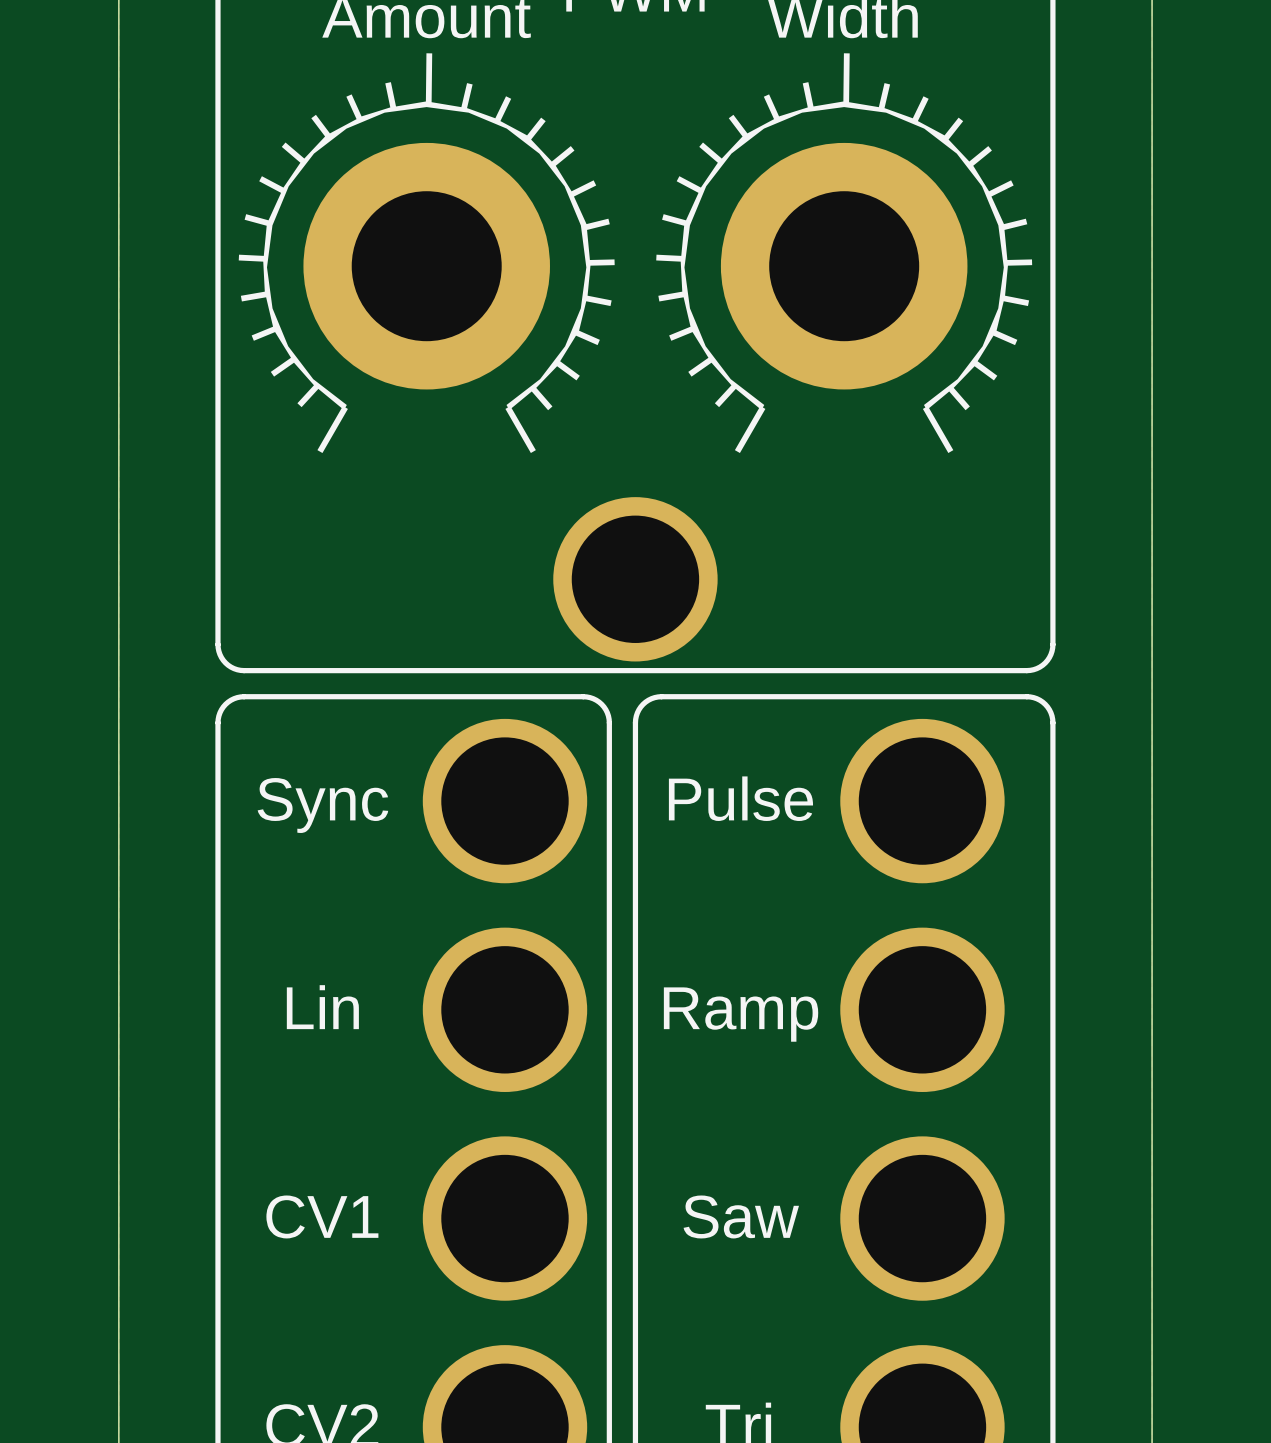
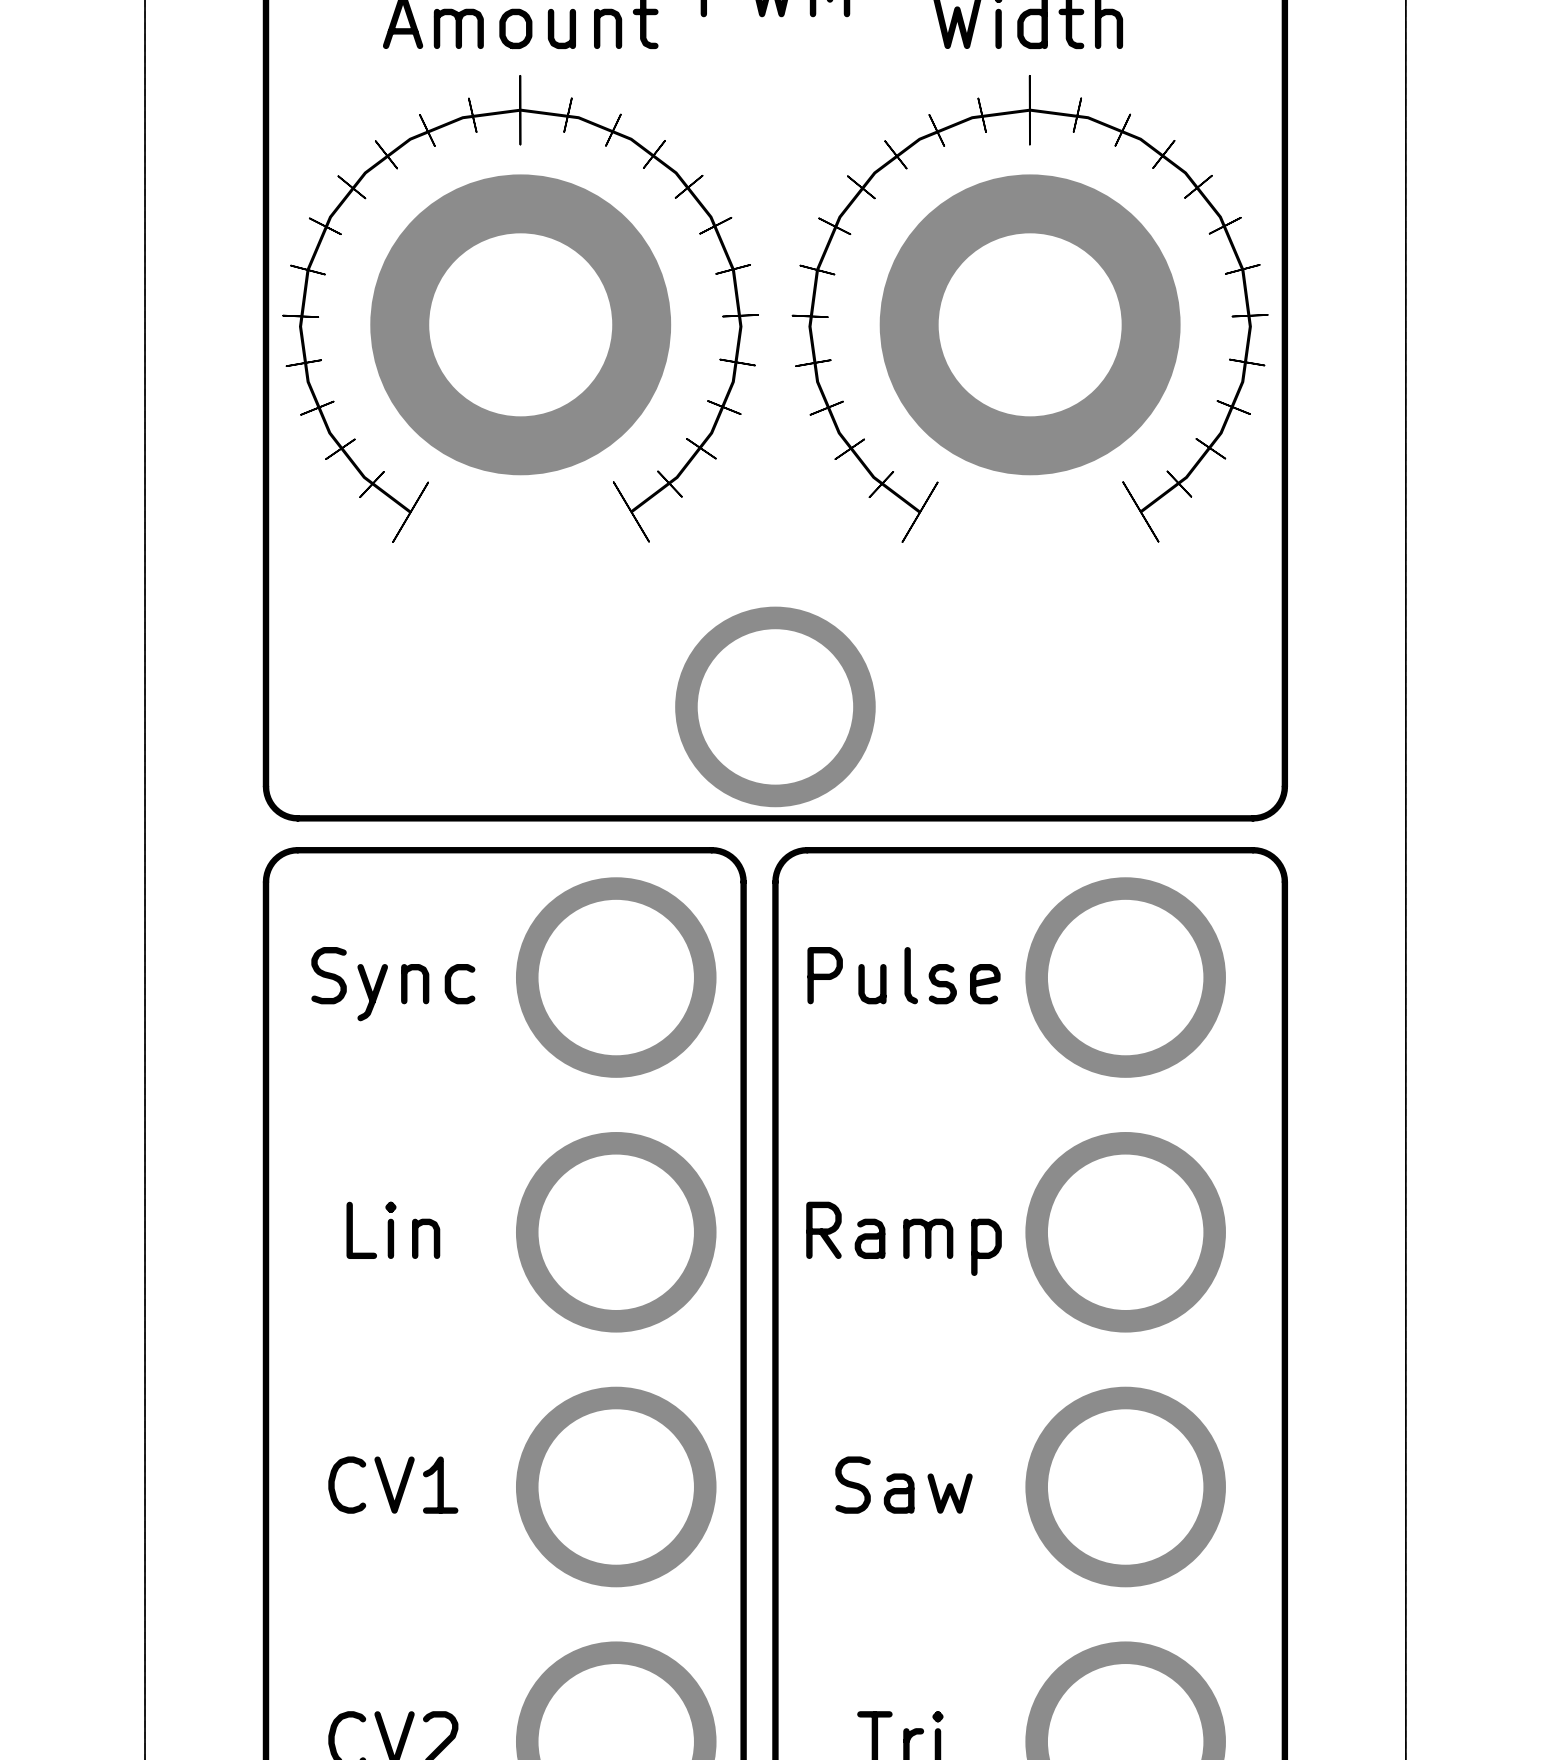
drawing shape: [238, 53, 615, 454] -> [282, 75, 759, 543]
drawing shape: [656, 53, 1033, 454] -> [792, 75, 1269, 543]

